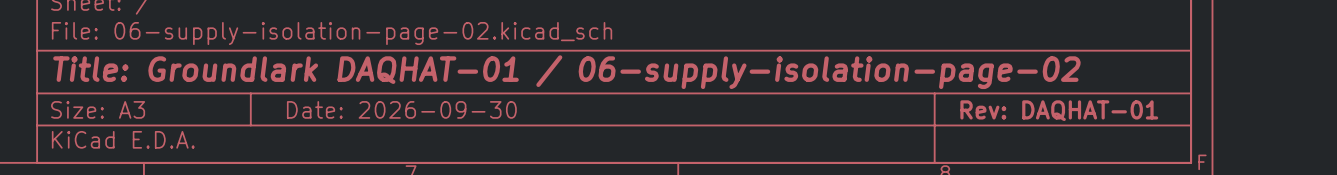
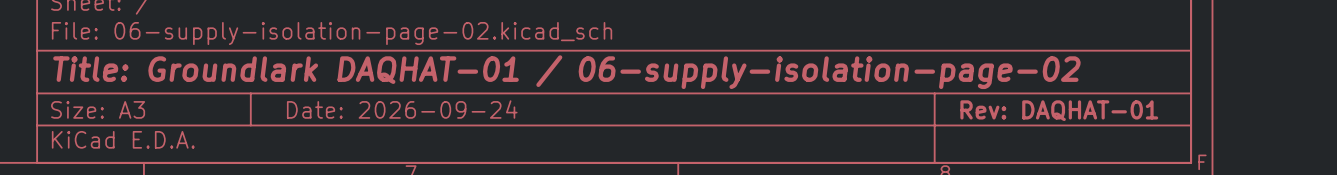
title block: Date: 2026-09-30 (401, 109) -> Date: 2026-09-24 (402, 109)

